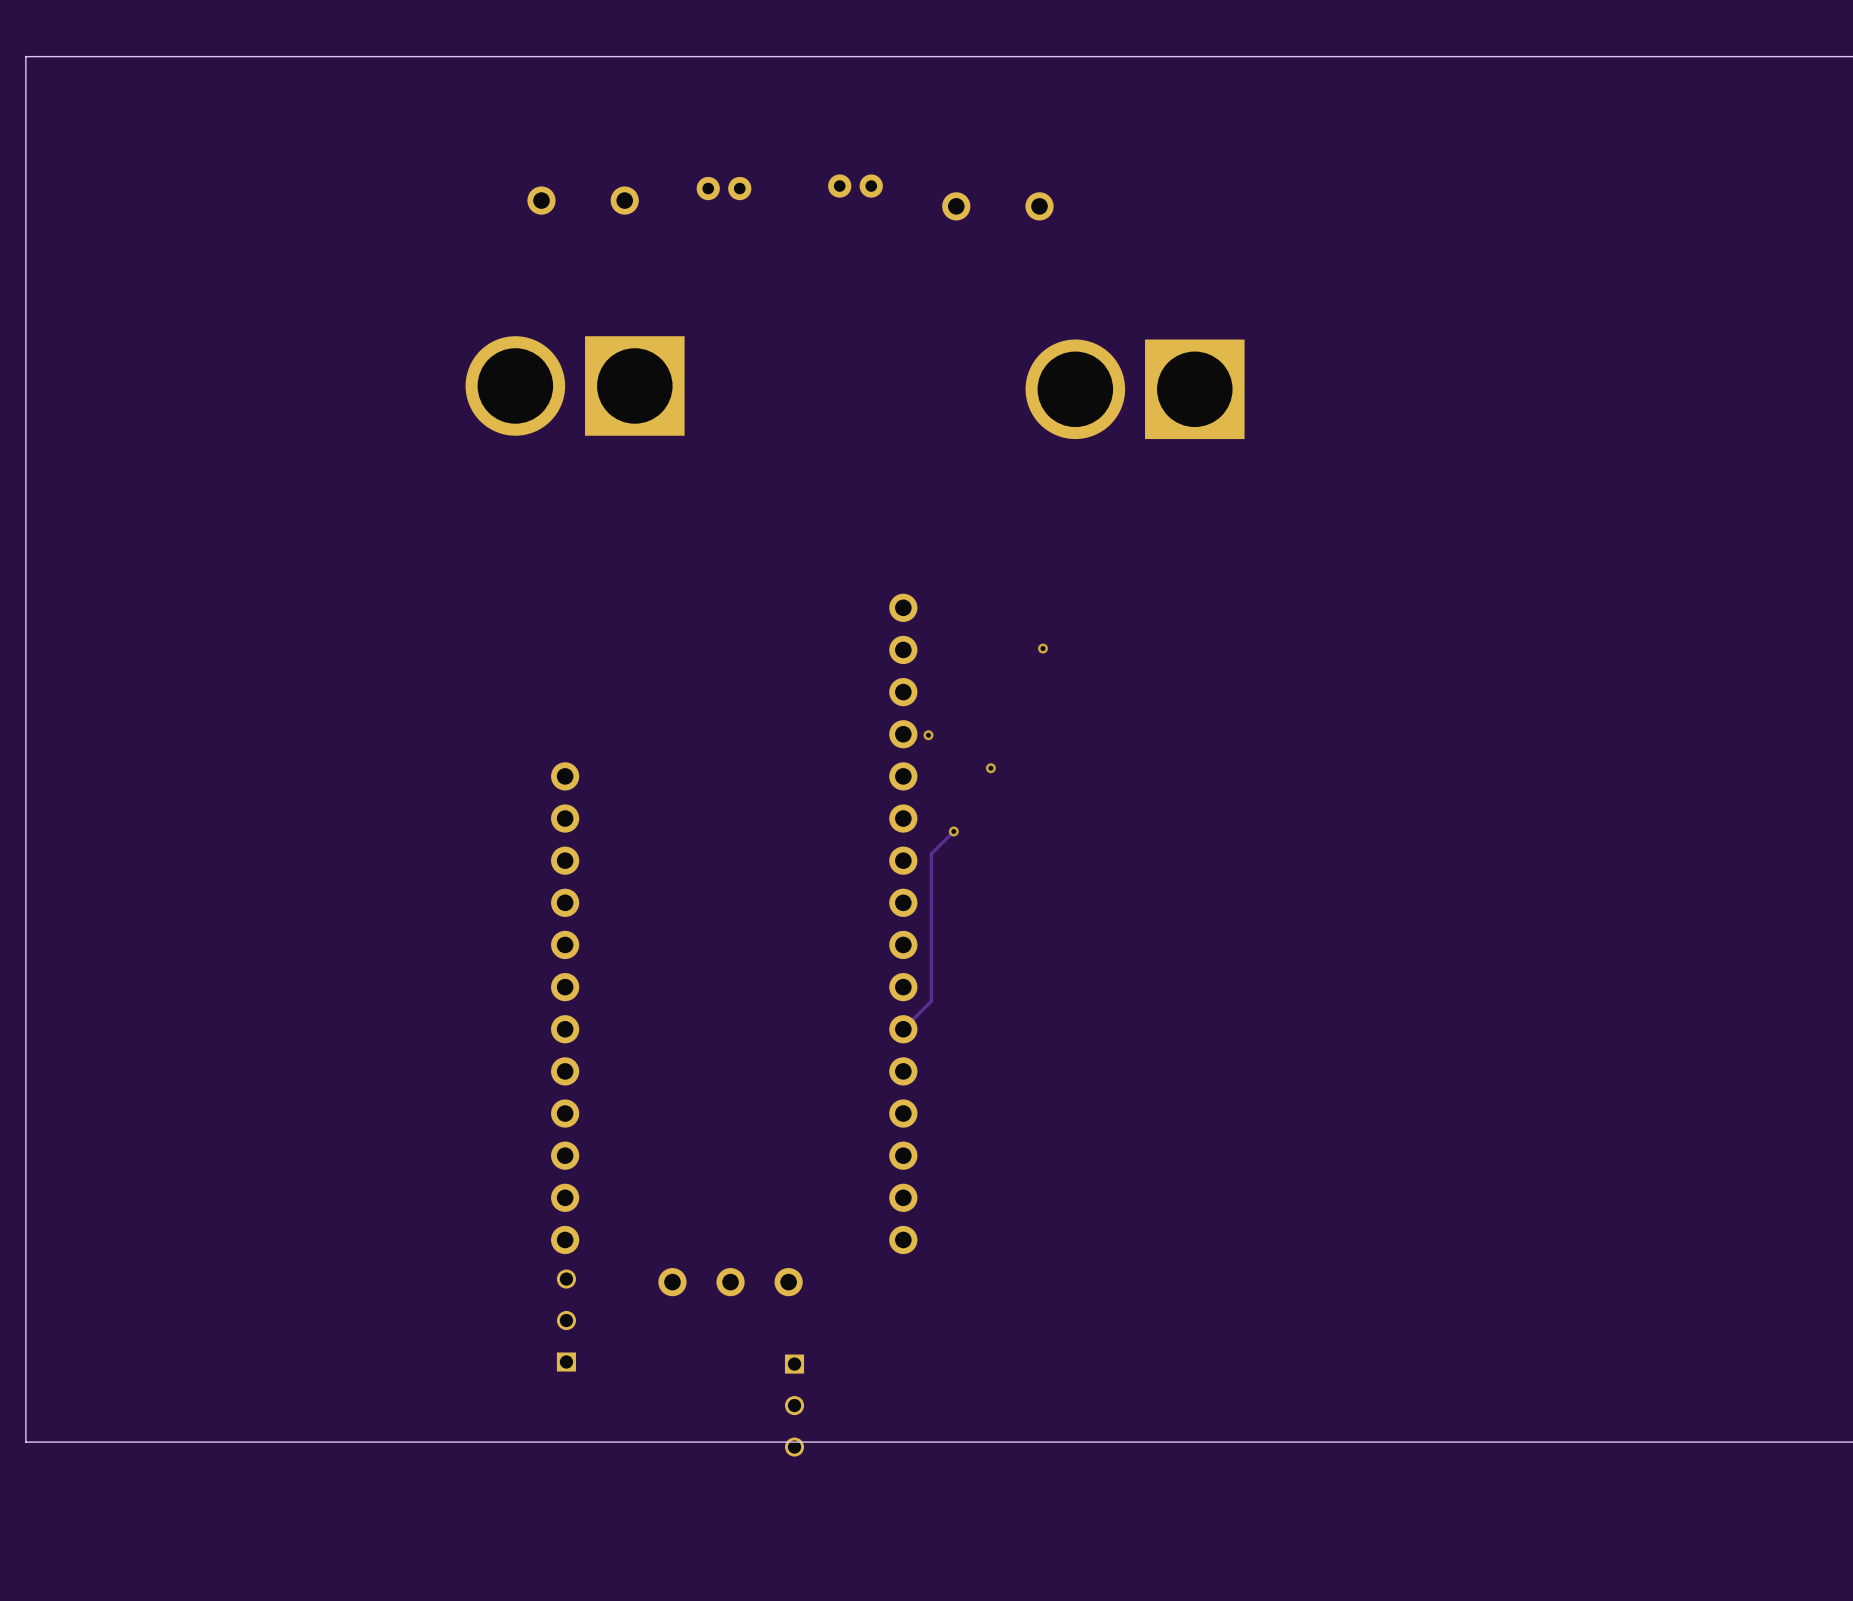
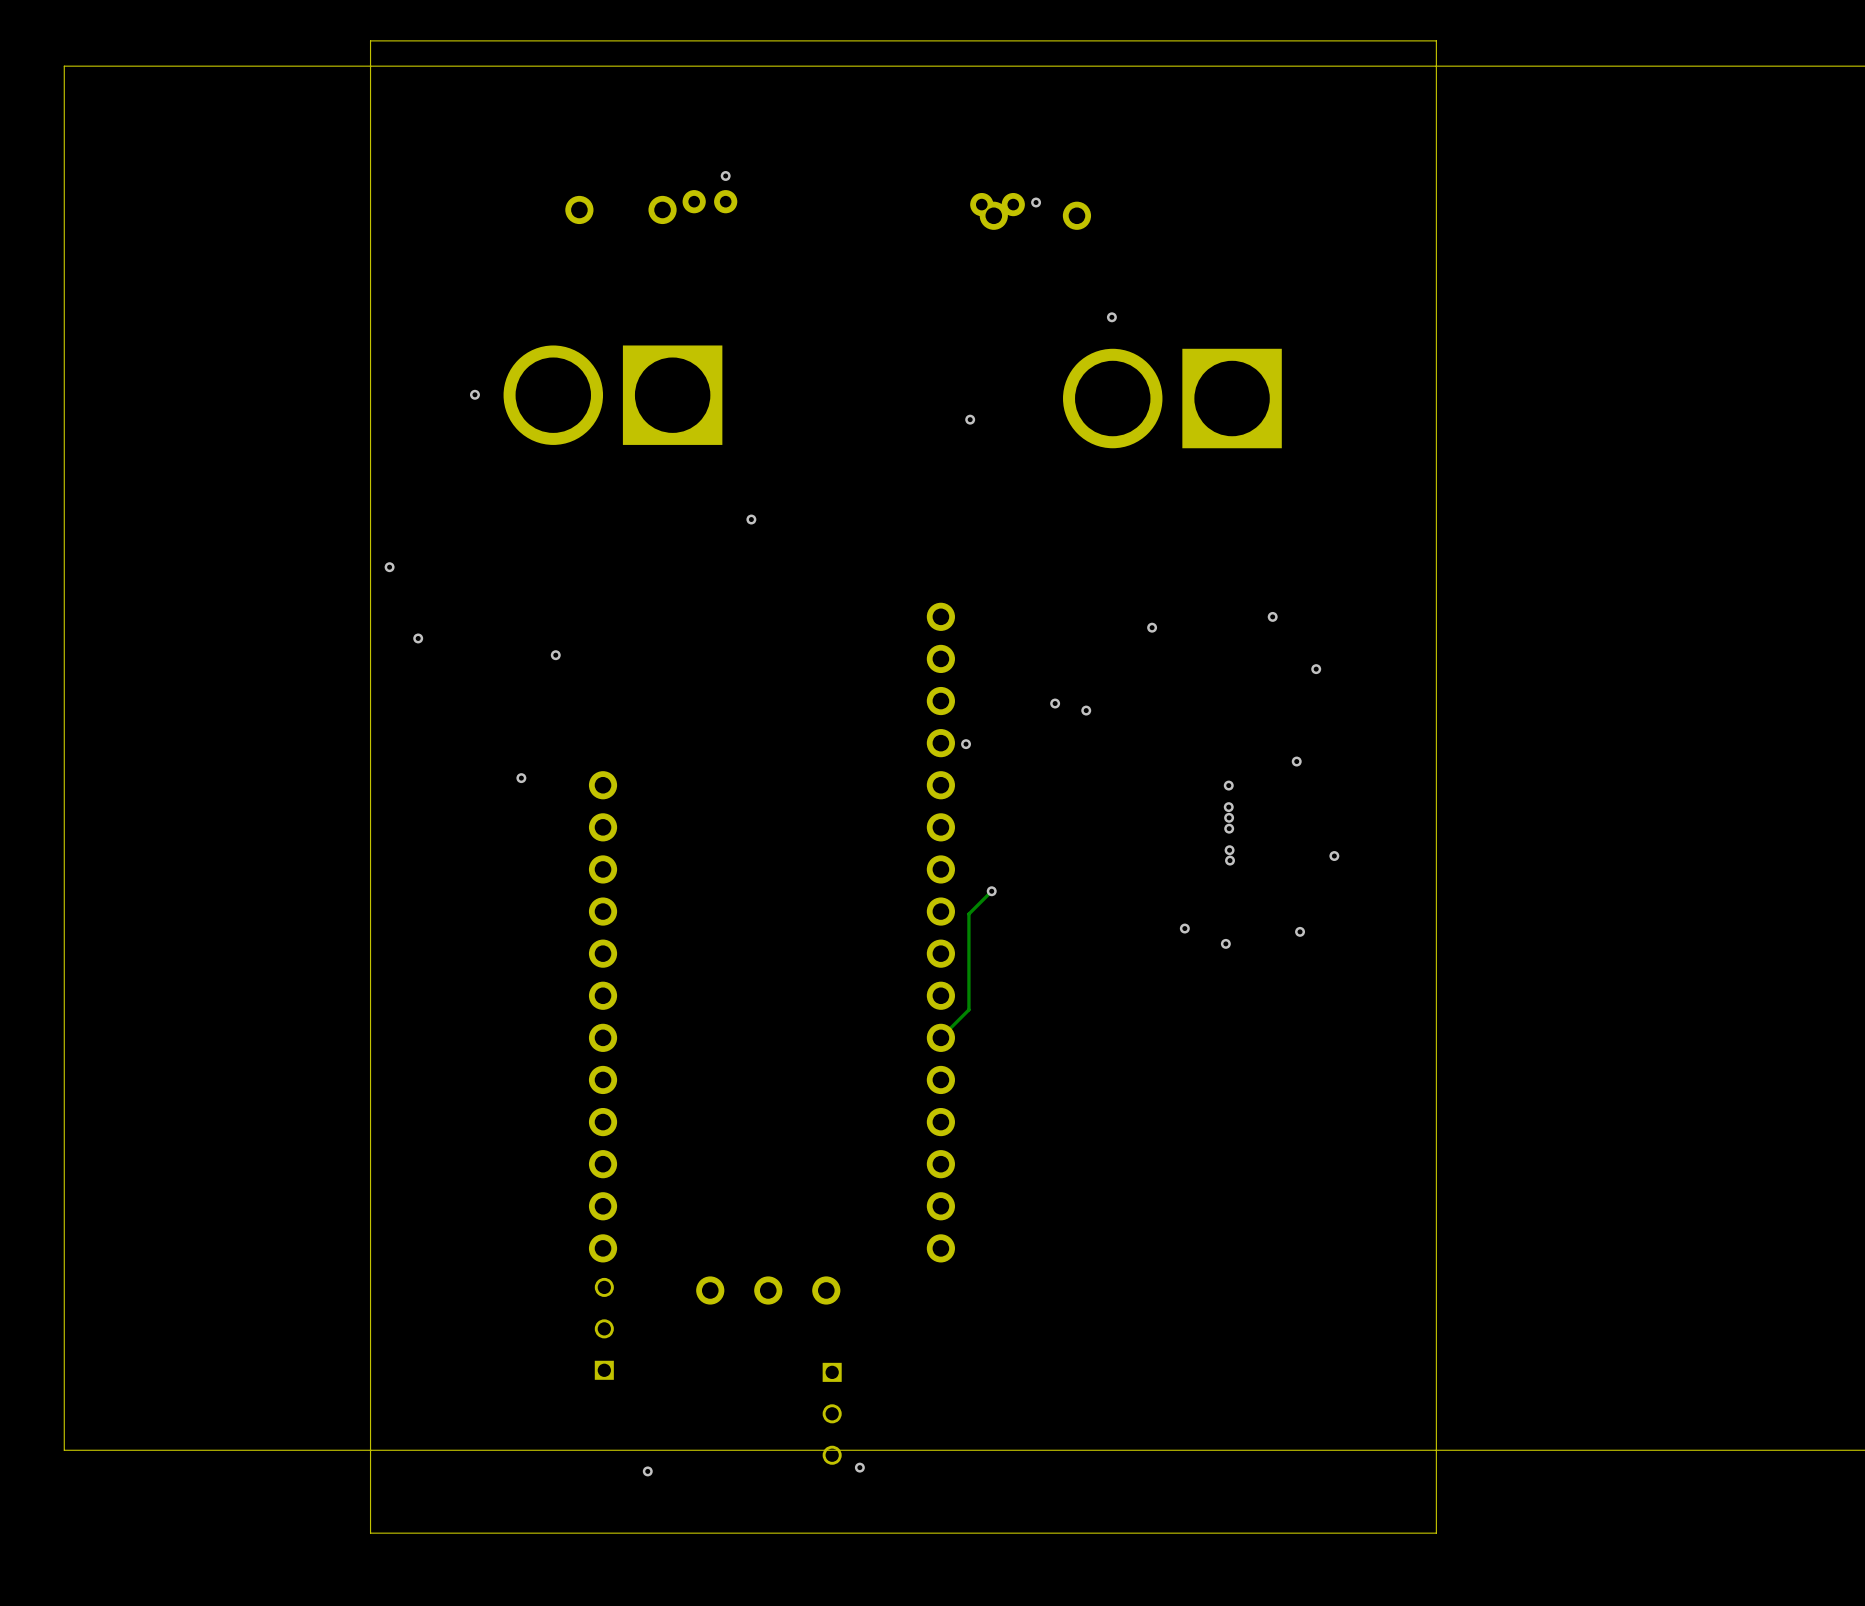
board edge: none -> (1436, 40) (370, 40) (370, 1533) (1436, 1533) (1436, 40)
via: none -> (725, 175)
part: (855, 186) -> none
part position: (724, 188) -> (709, 201)
via: none -> (1036, 202)
part: none -> (997, 204)
via: none -> (1111, 317)
via: none -> (474, 394)
via: none -> (970, 419)
via: none -> (751, 519)
via: none -> (389, 567)
via: none -> (1272, 616)
via: none -> (1152, 627)
via: none -> (418, 638)
via: none -> (555, 655)
via: (1042, 648) -> none
via: none -> (1316, 669)
via: none -> (1055, 703)
via: none -> (1086, 710)
via: none -> (1296, 761)
via: (990, 768) -> none
via: none -> (521, 778)
via: none -> (1228, 785)
via: none -> (1228, 807)
via: none -> (1229, 817)
via: none -> (1229, 828)
track: (953, 831) (931, 853) (931, 905) -> (991, 891) (968, 914)
via position: (953, 831) -> (991, 891)
via: none -> (1229, 850)
via: none -> (1334, 856)
via: none -> (1230, 860)
via: none -> (1184, 928)
via: none -> (1300, 931)
via: none -> (1225, 943)
via: none -> (859, 1467)
via: none -> (647, 1471)

